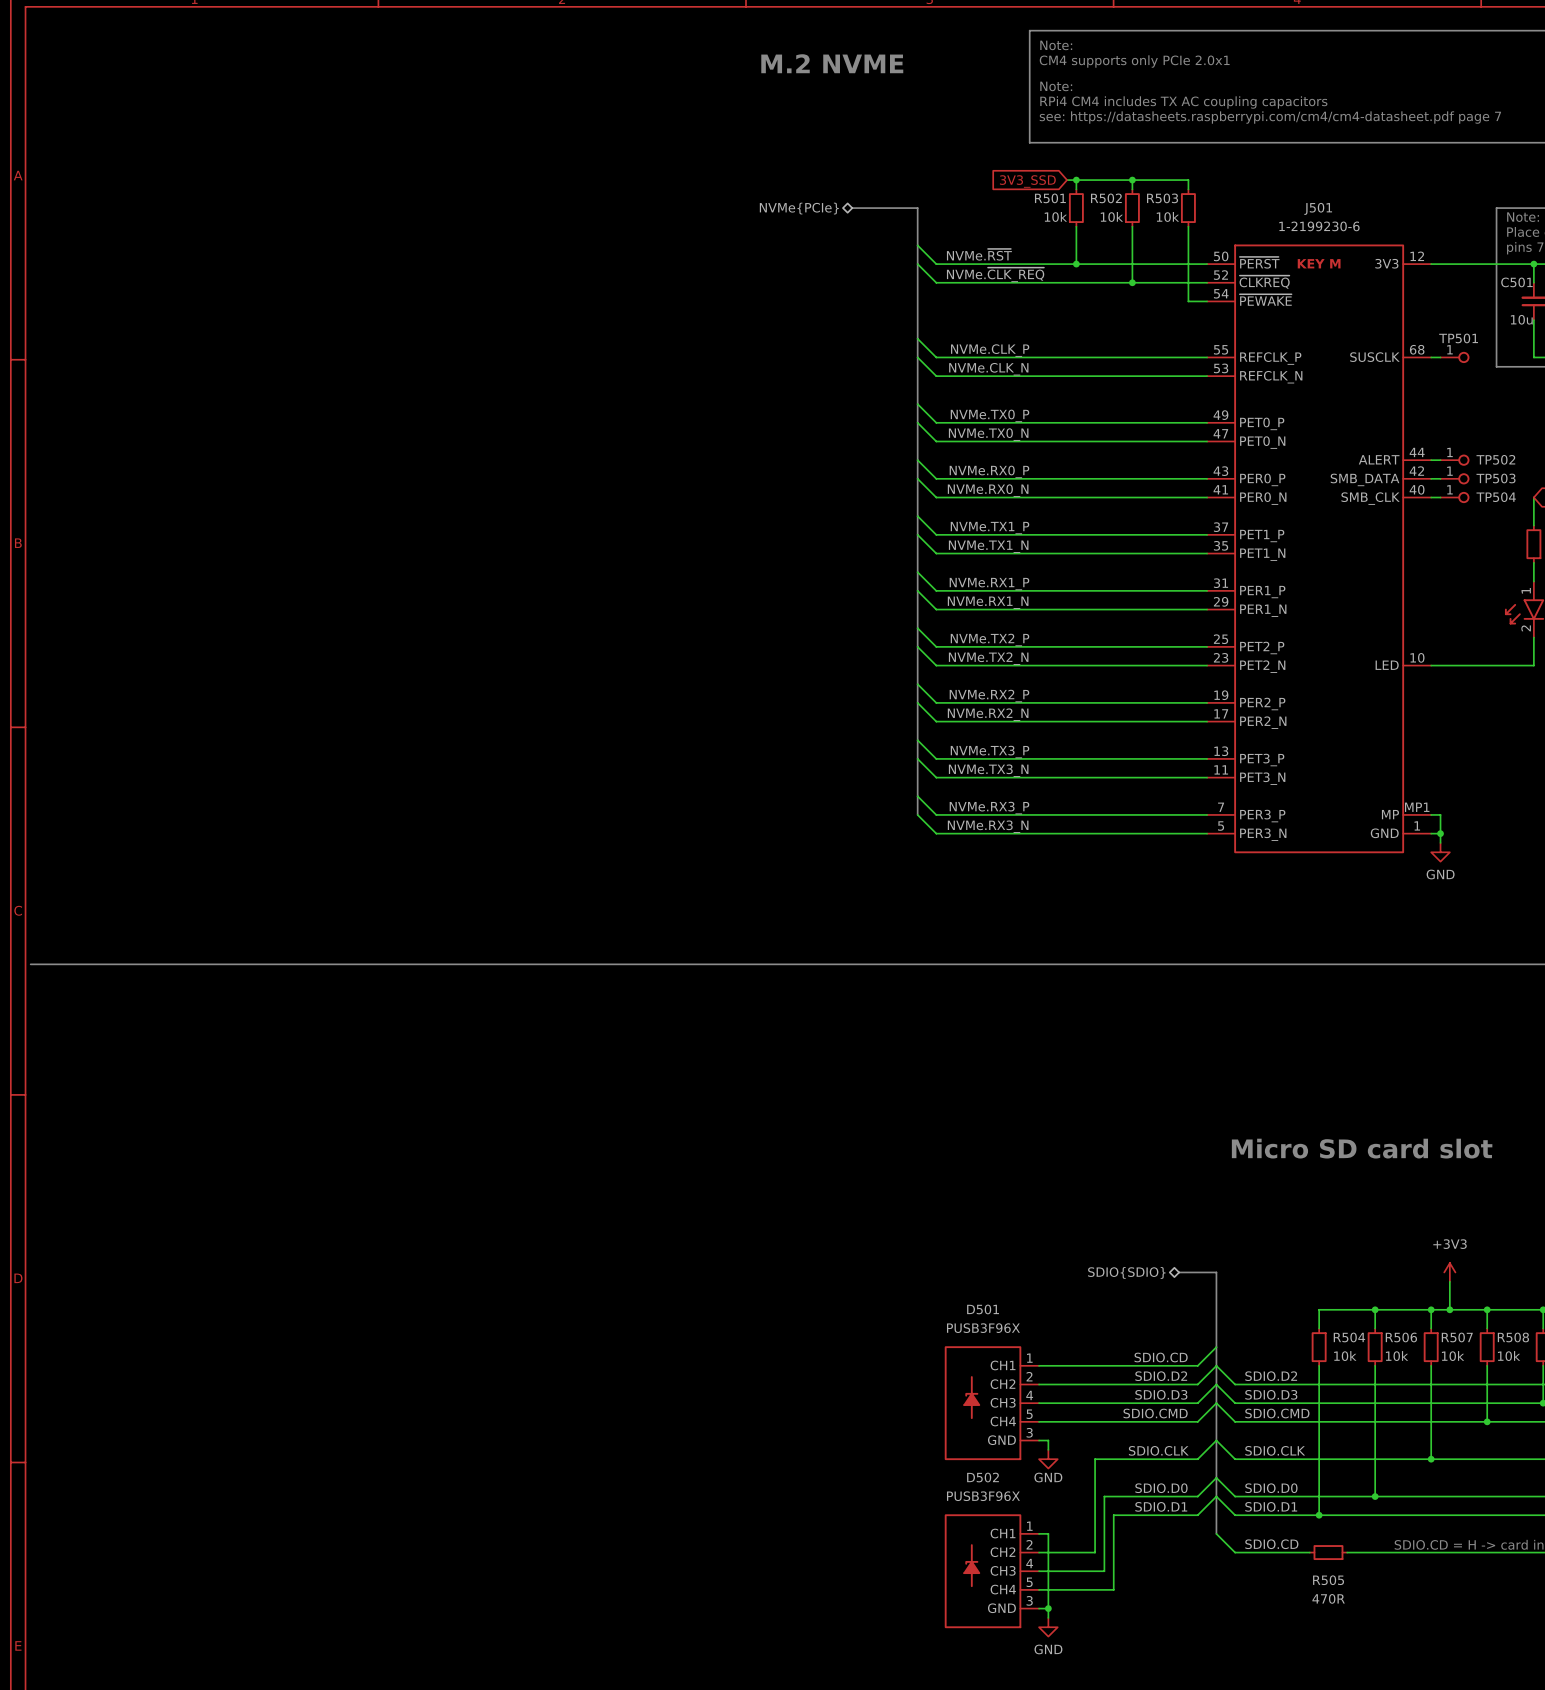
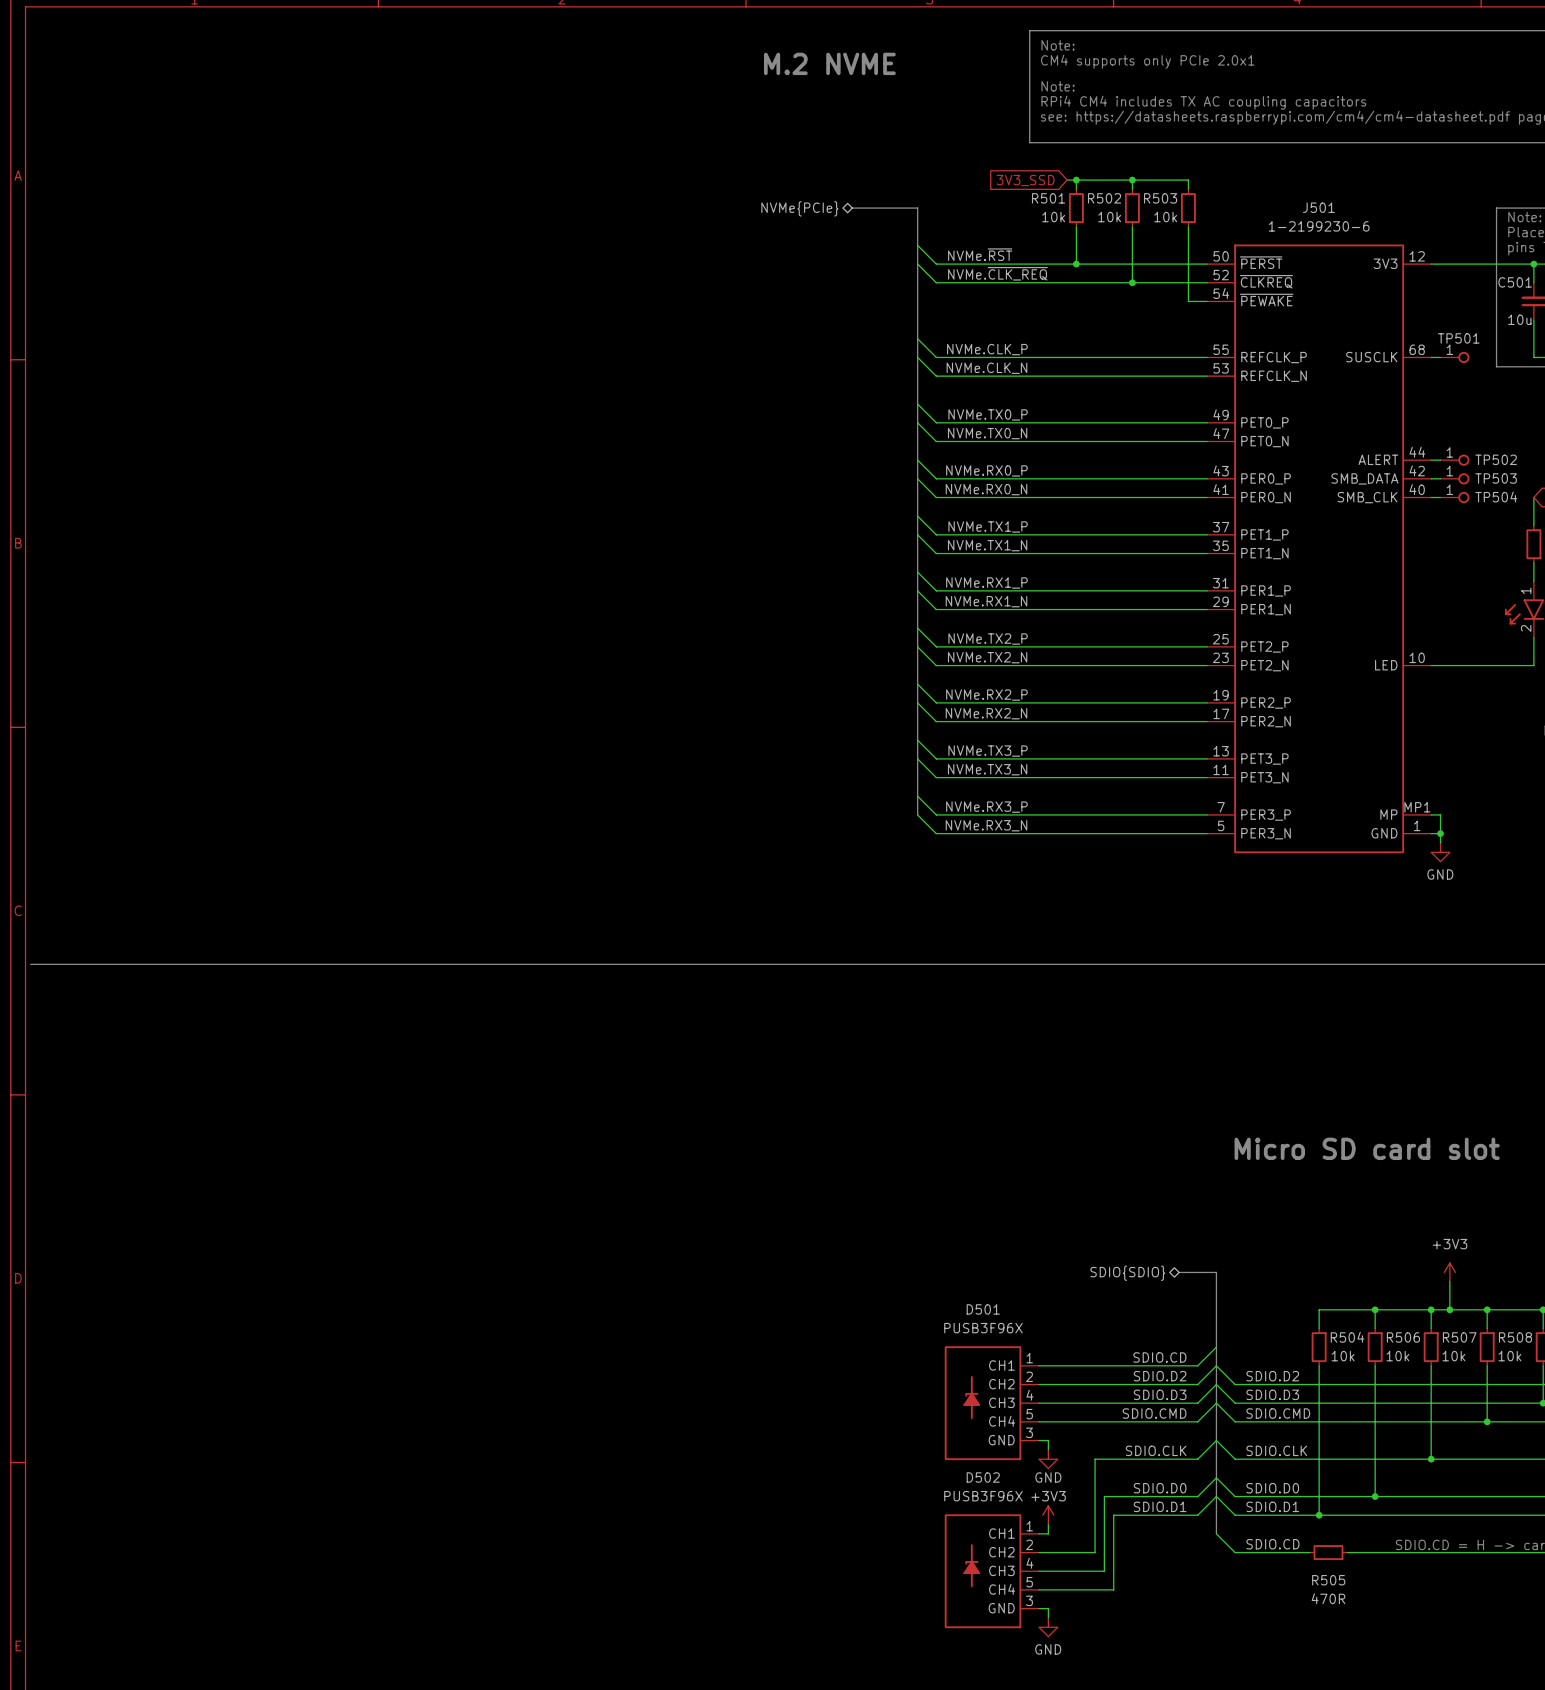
J501 text: KEY M (1319, 263) -> none
power symbol: none -> +3V3 (1048, 1515)
wire: (1048, 1533) (1048, 1608) -> (1048, 1533) (1048, 1524)
junction: (1048, 1608) -> none

